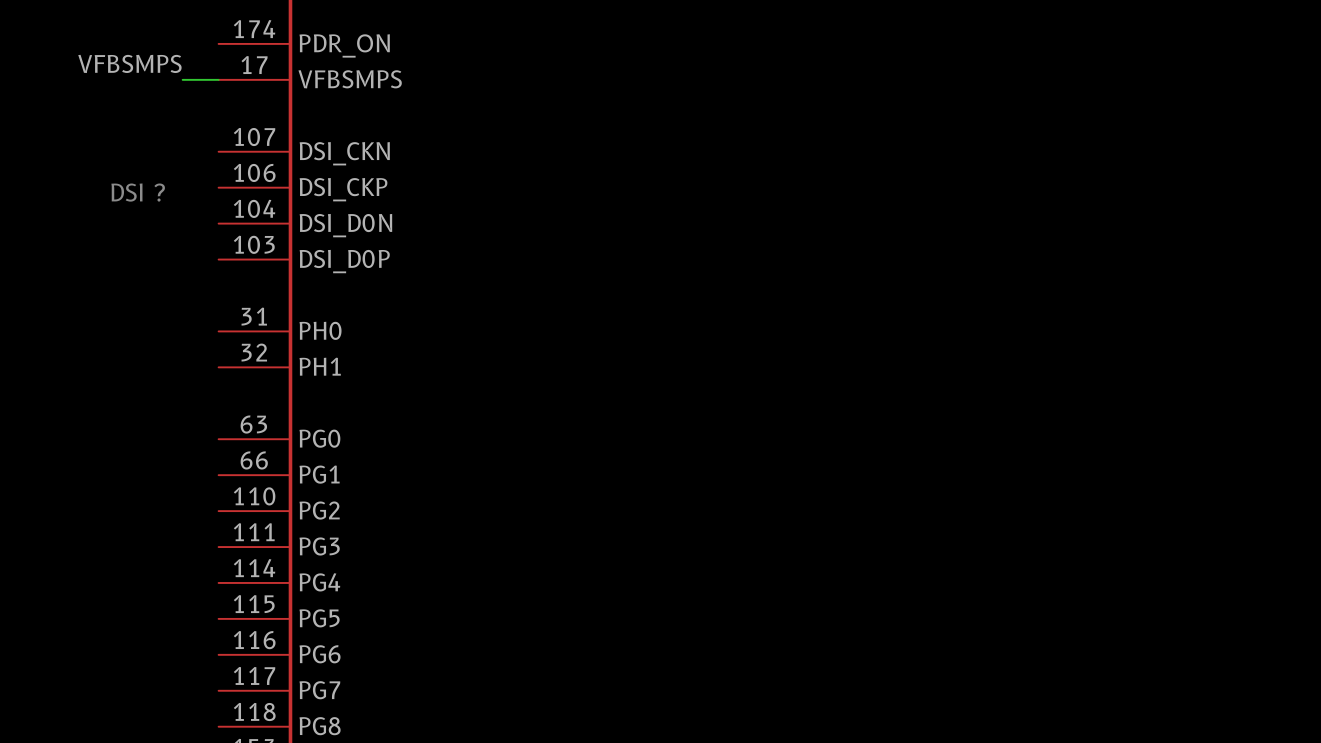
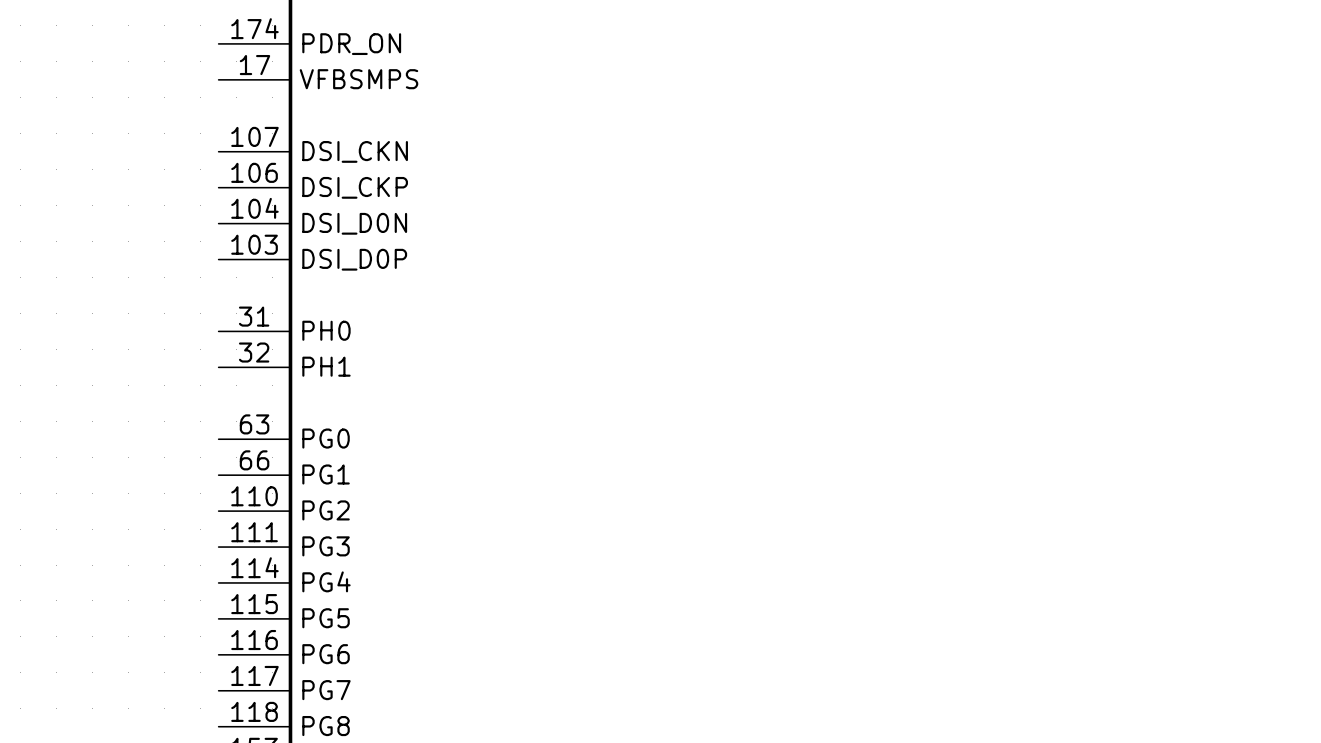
label: VFBSMPS (129, 63) -> none
wire: (182, 79) (218, 79) -> none
text: DSI ? (138, 192) -> none

